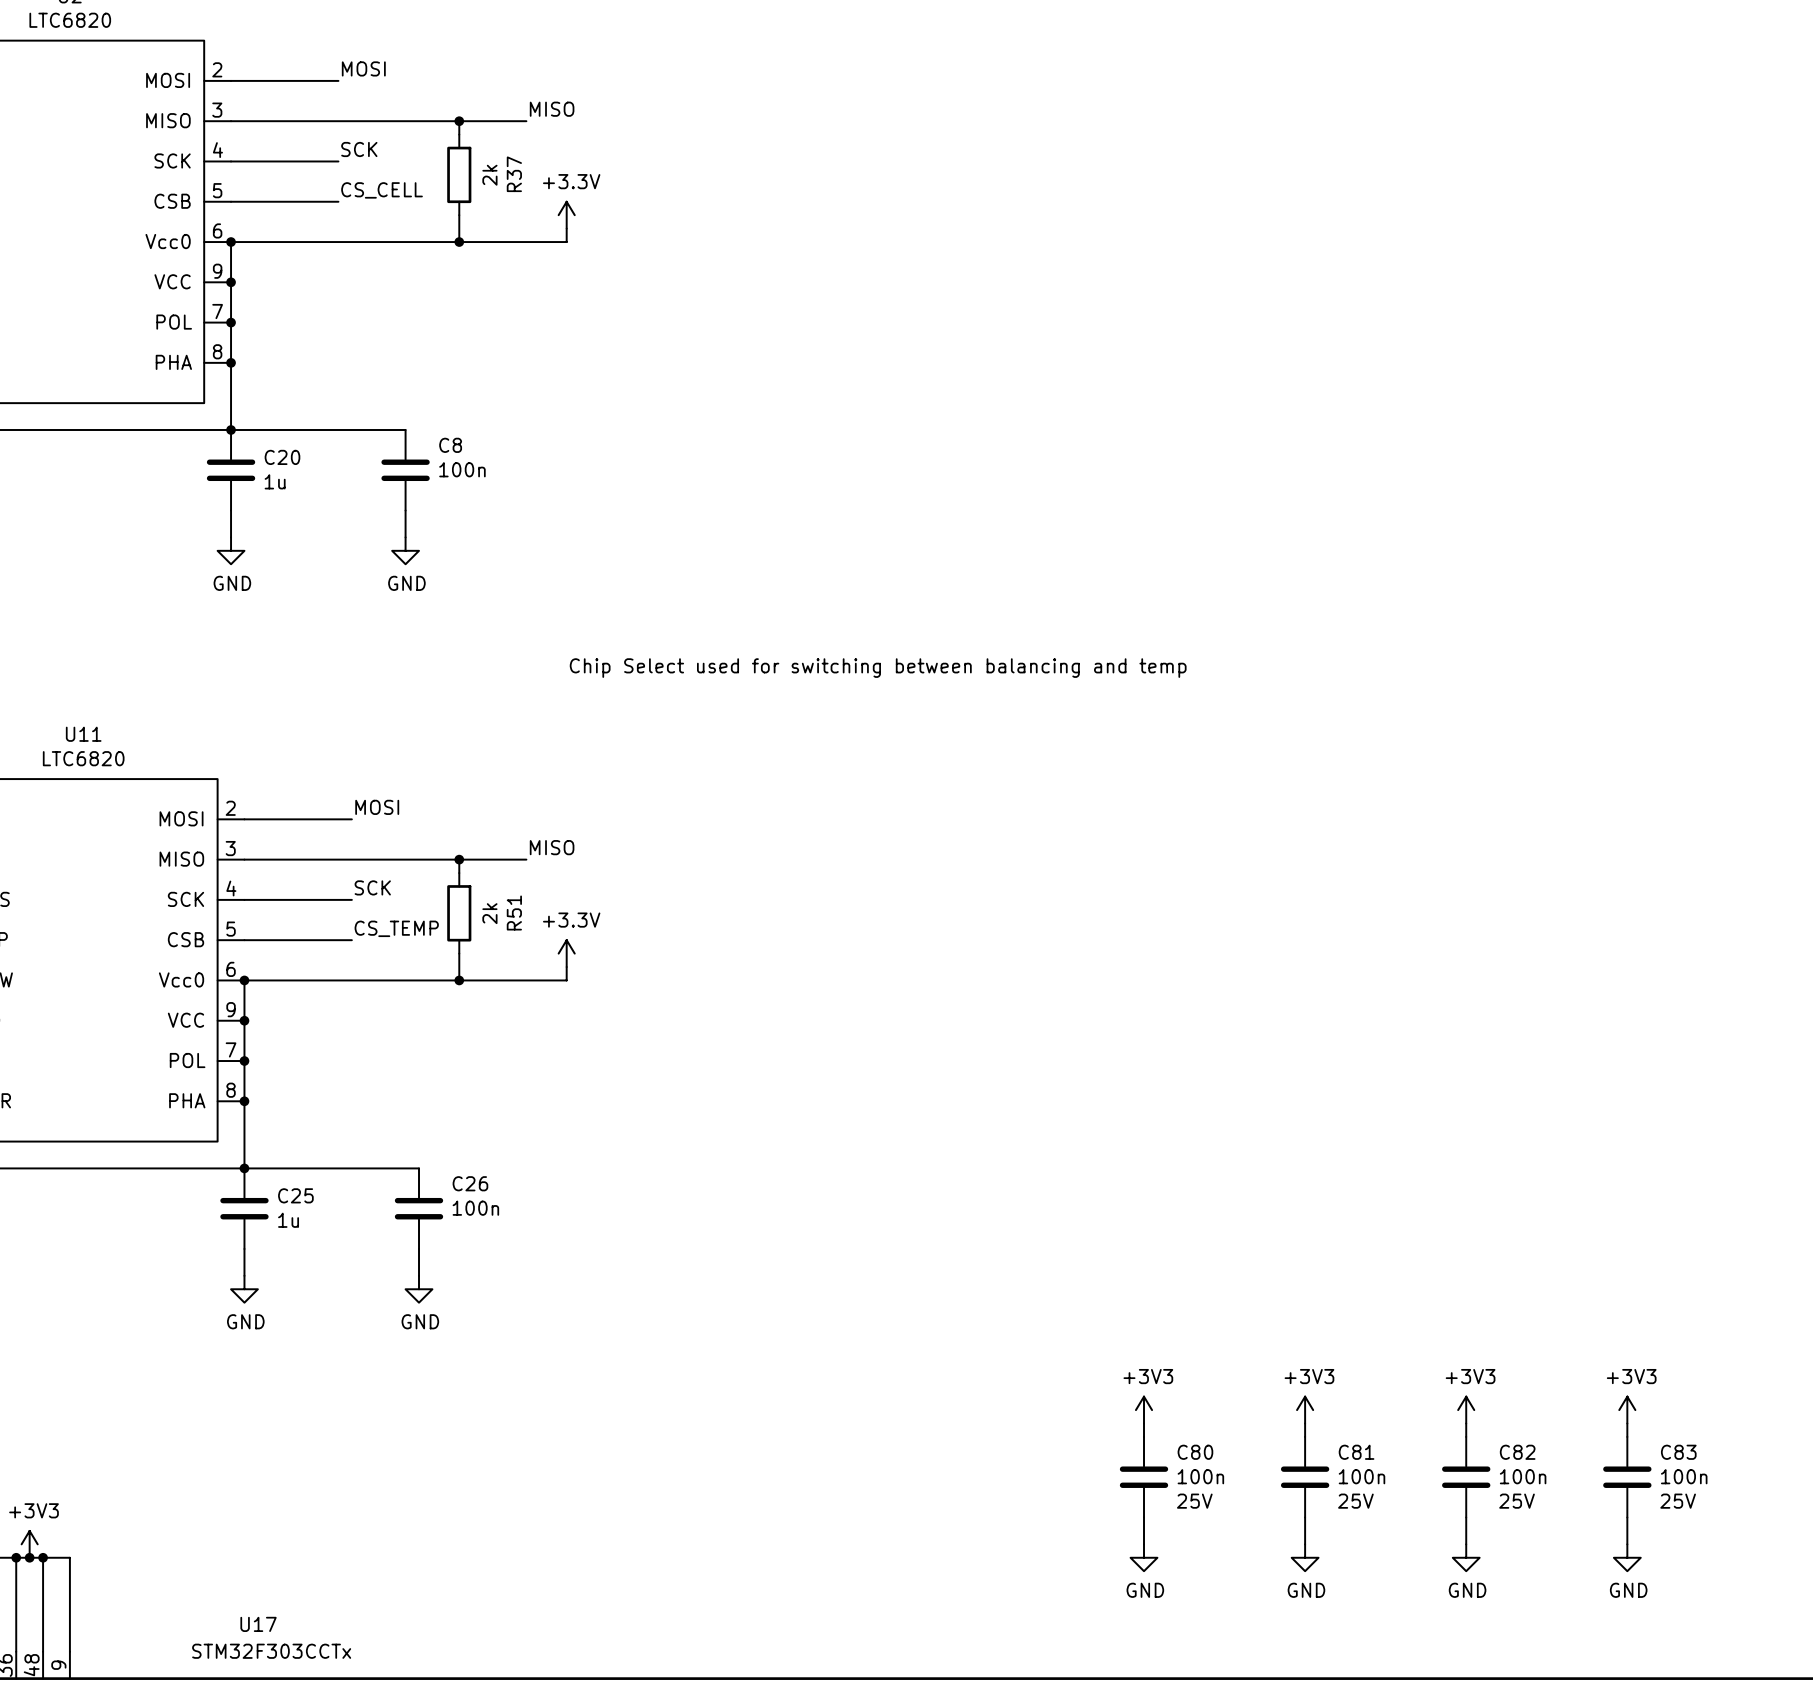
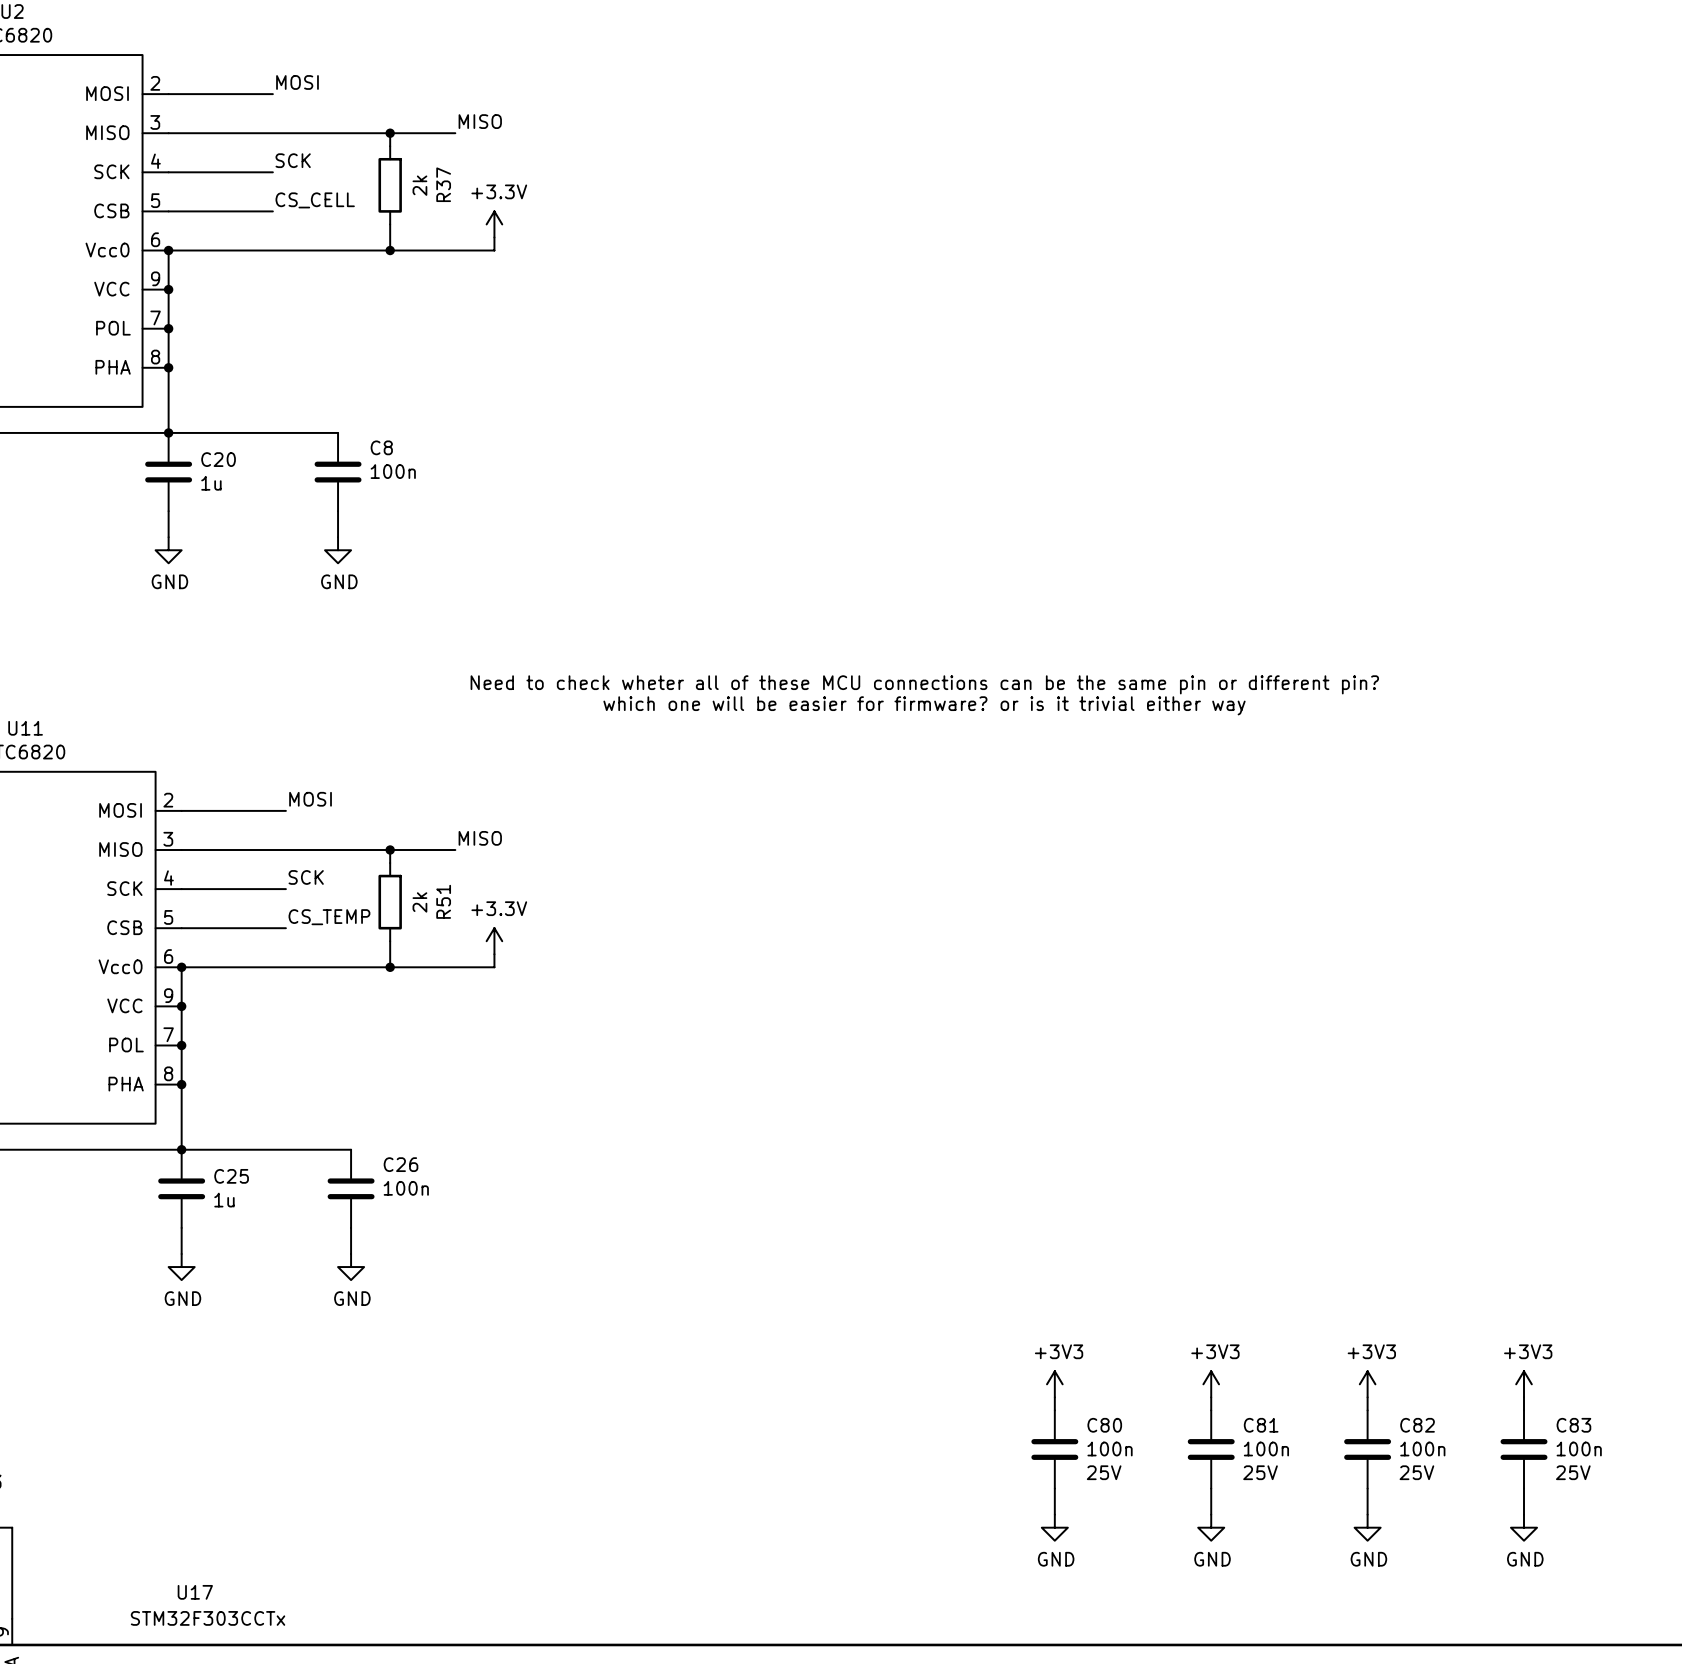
text: Chip Select used for switching between balancing and temp (878, 668) -> none
text: none -> Need to check wheter all of these MCU connections can be the same pin or different pin? (924, 684)
text: none -> which one will be easier for firmware? or is it trivial either way (924, 705)

